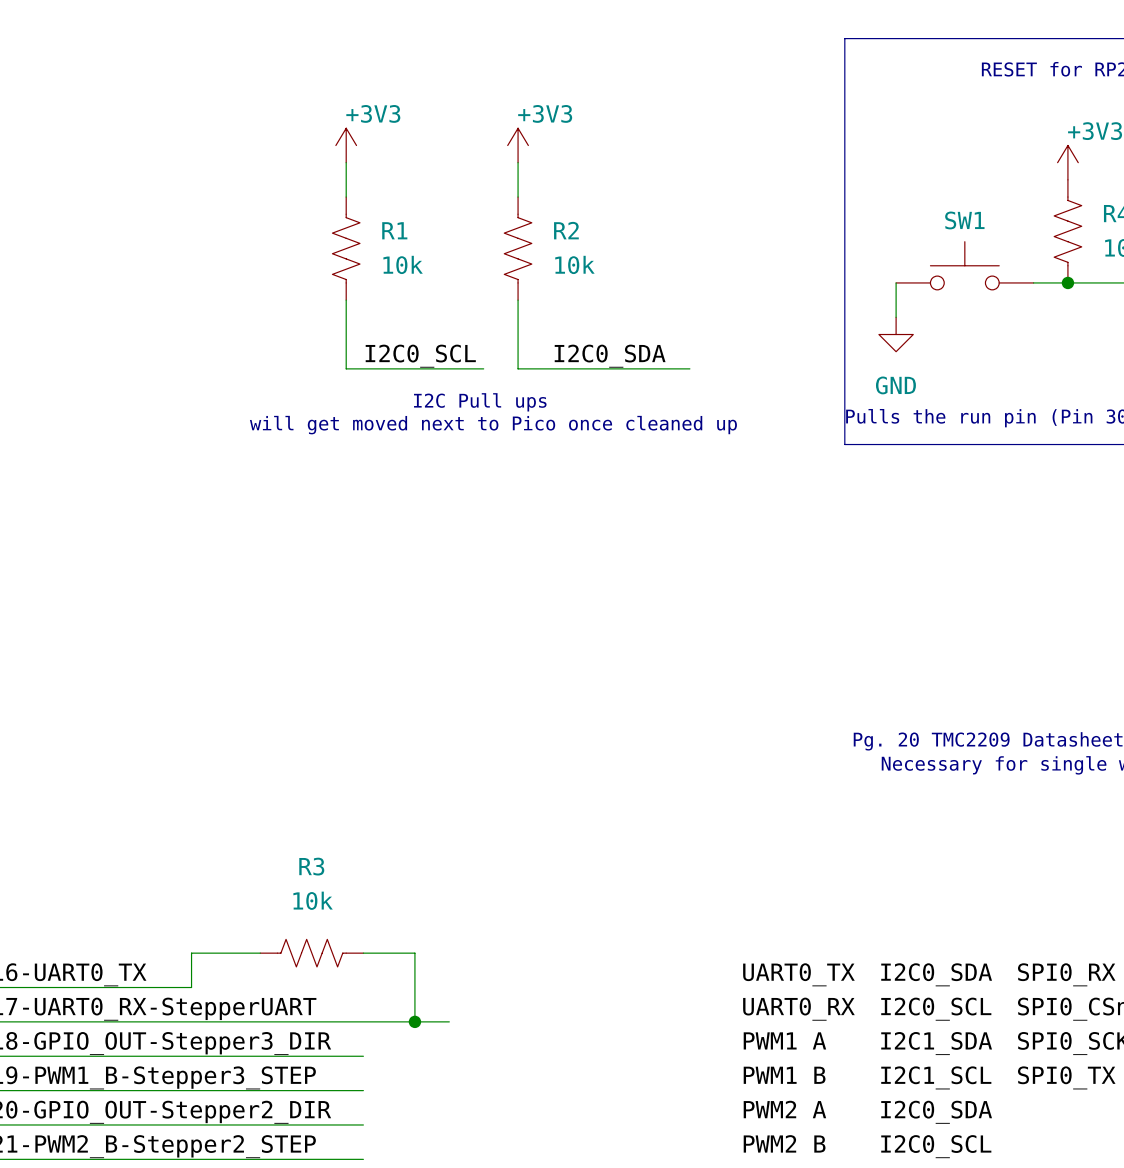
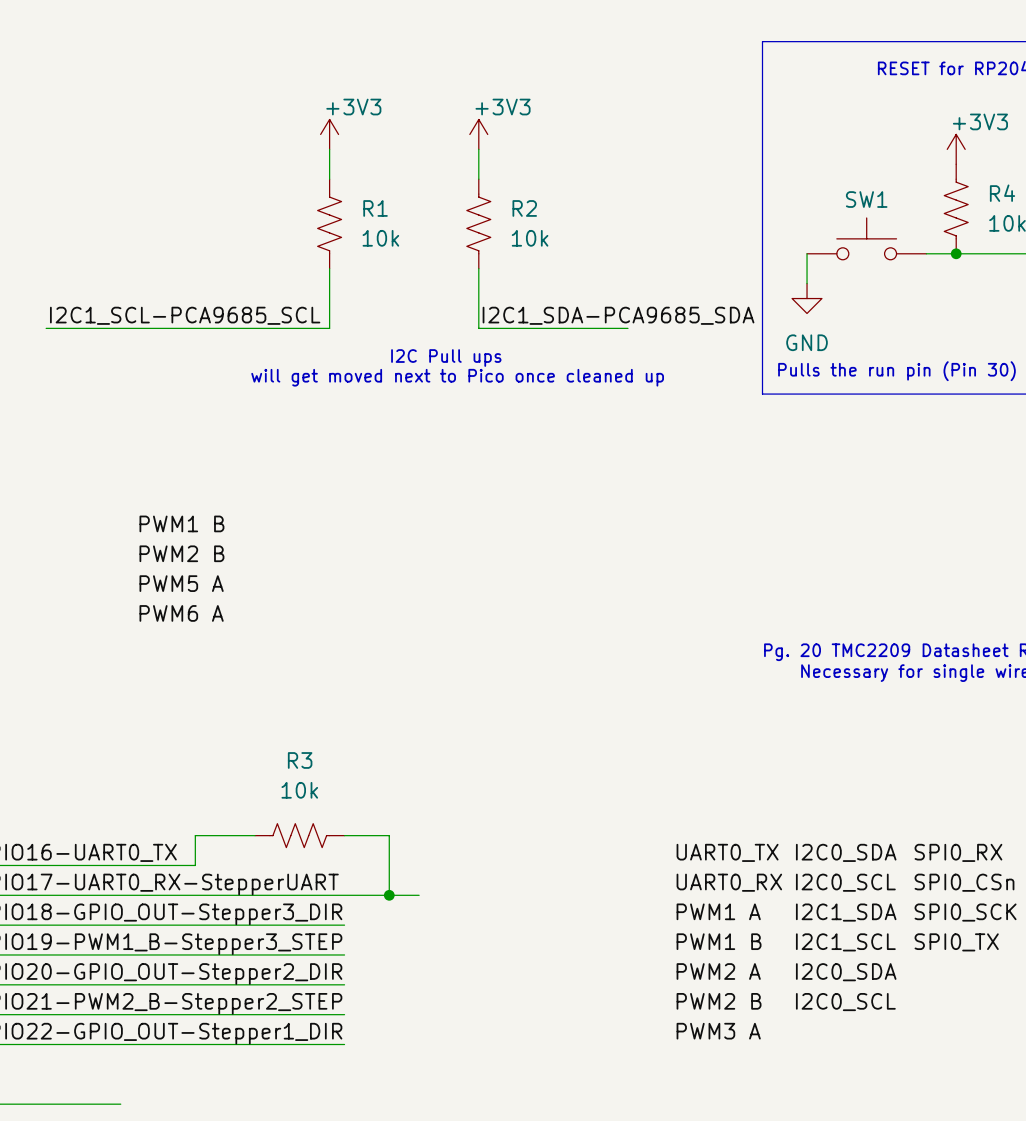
label: none -> I2C1_SCL-PCA9685_SCL (185, 315)
label: I2C0_SCL (420, 356) -> none
label: I2C0_SDA (610, 356) -> none
label: none -> I2C1_SDA-PCA9685_SDA (618, 315)
wire: (346, 368) (483, 368) -> (329, 328) (46, 328)
label: none -> PWM1 B (181, 523)
label: none -> PWM2 B (181, 553)
label: none -> PWM5 A (181, 583)
label: none -> PWM6 A (181, 613)

